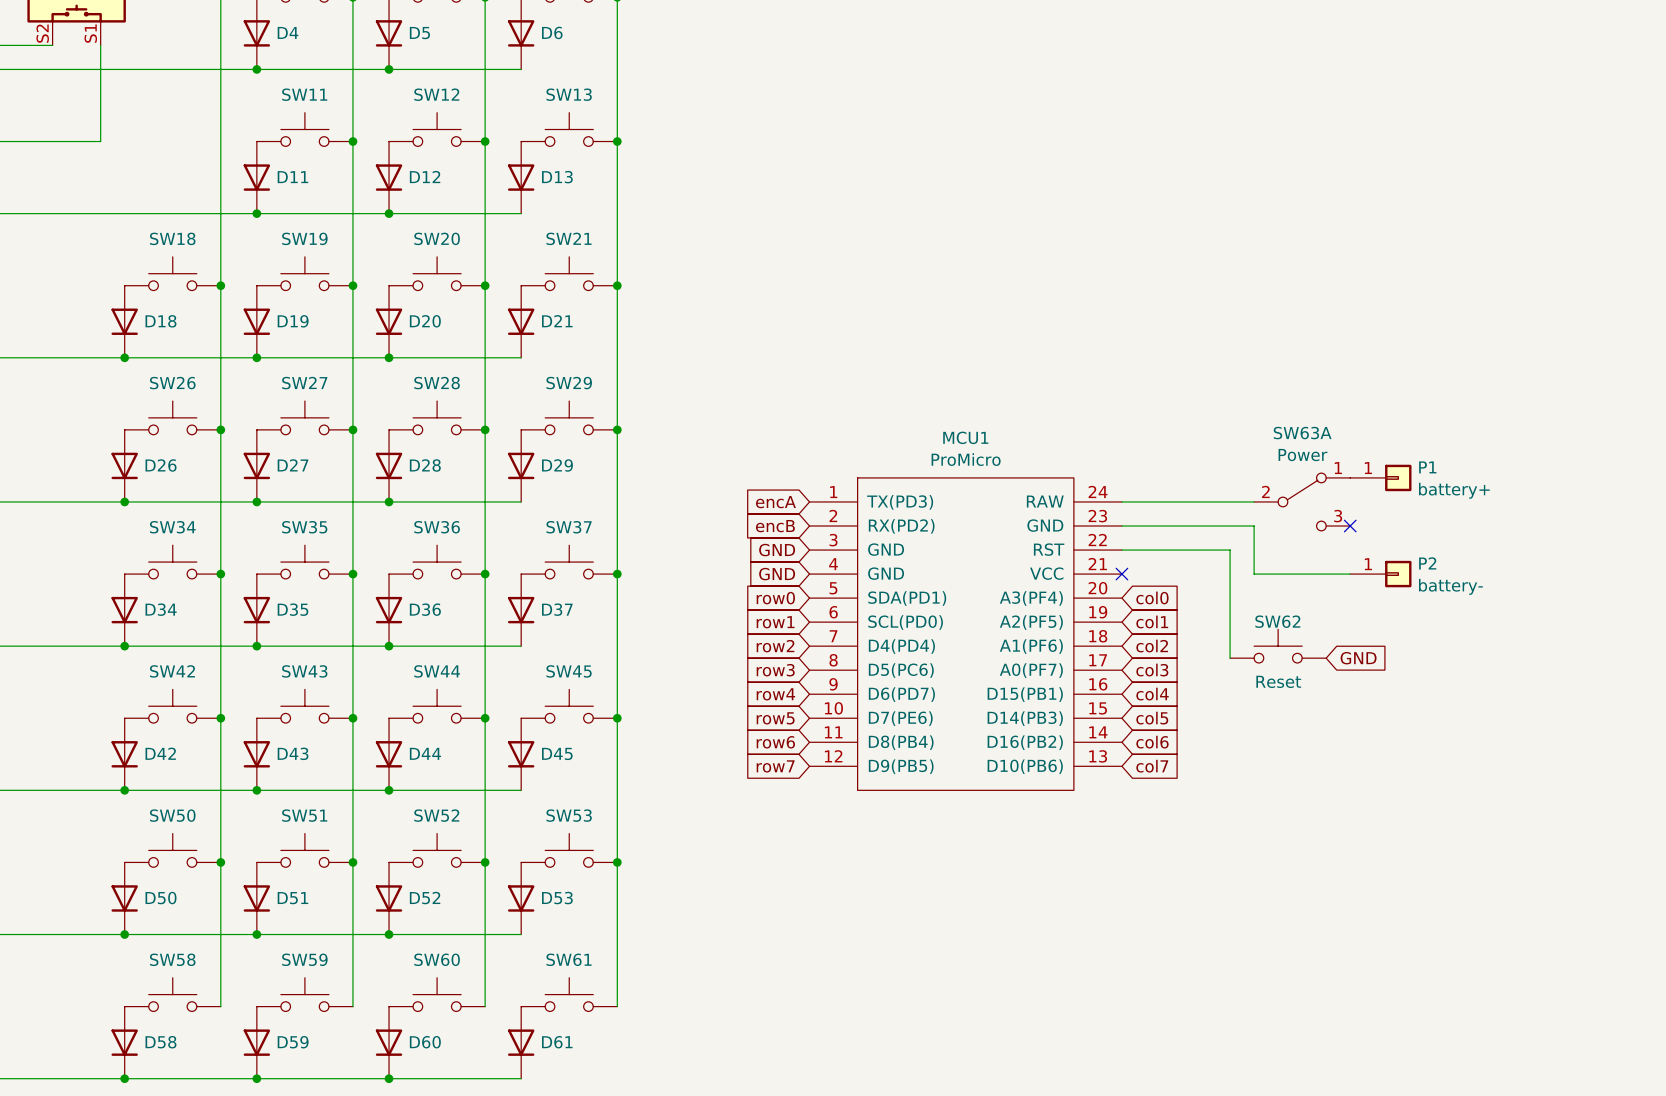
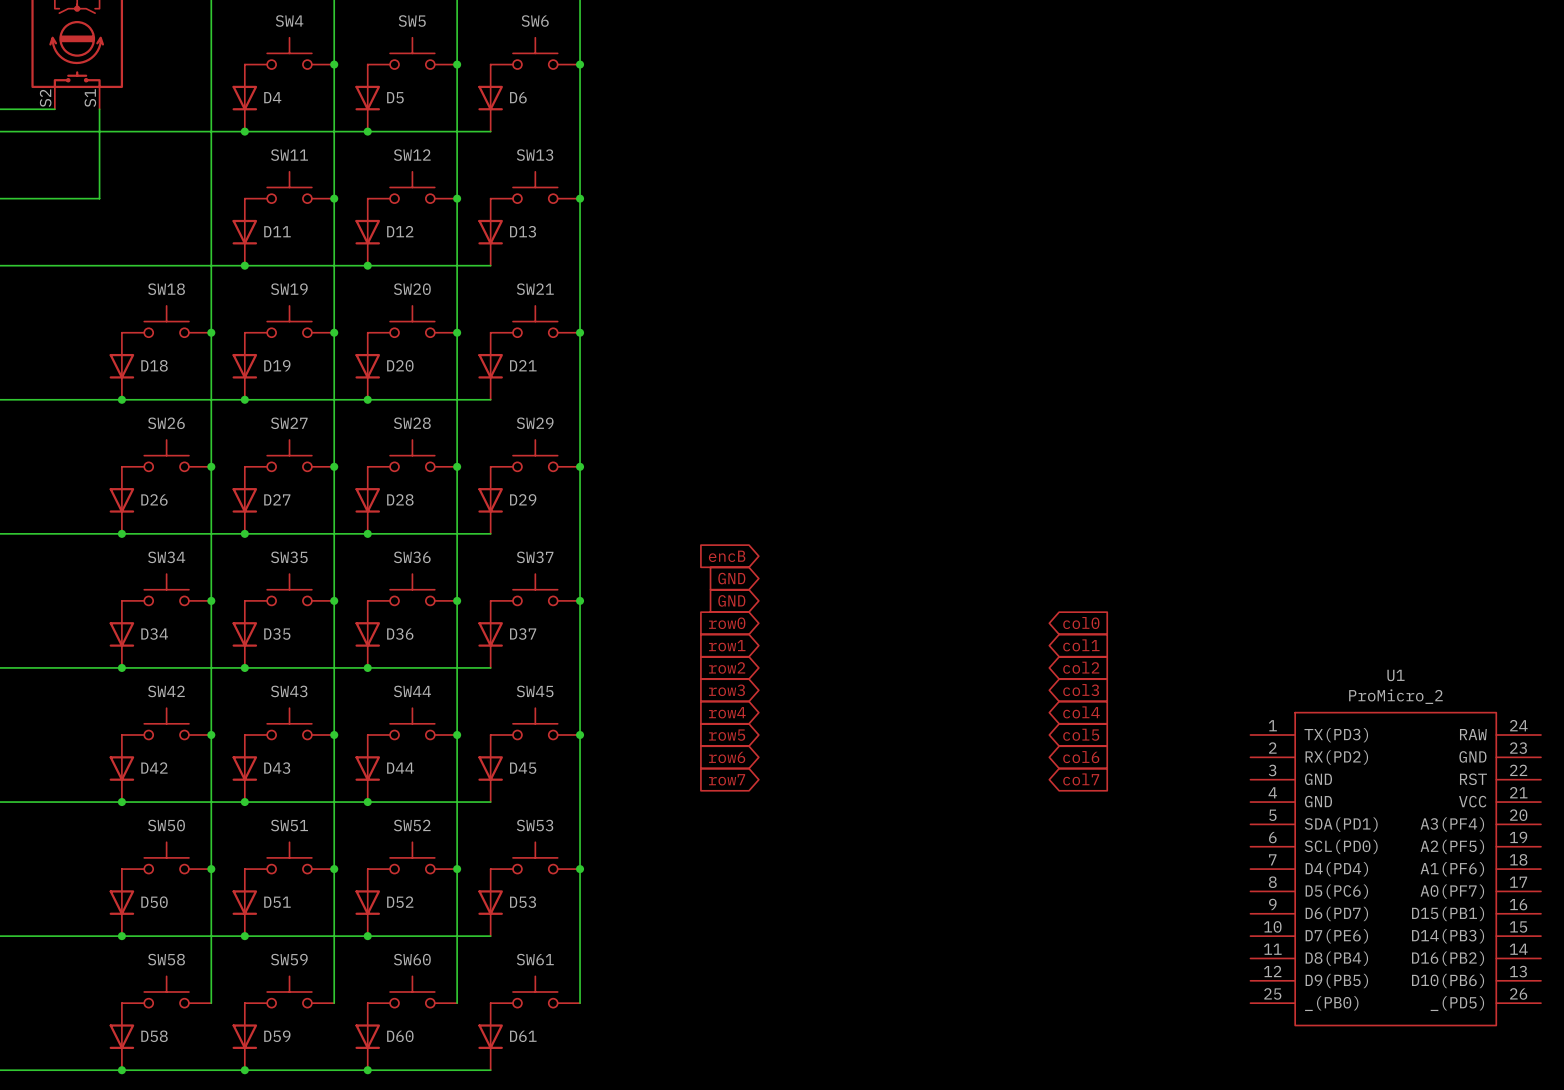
P1: battery+ (1380, 477) -> none
wire: (1121, 501) (1254, 501) -> none
SW63A: Power (1302, 501) -> none
global label: encA (775, 502) -> none
wire: (1121, 526) (1254, 526) (1254, 574) (1350, 574) -> none
no-connect mark: (1350, 526) -> none
wire: (1121, 550) (1230, 550) (1230, 658) -> none
no-connect mark: (1121, 574) -> none
P2: battery- (1380, 574) -> none
MCU1: ProMicro (965, 634) -> none
SW62: Reset (1278, 646) -> none
global label: GND (1358, 658) -> none
U1: none -> ProMicro_2 (1395, 869)

